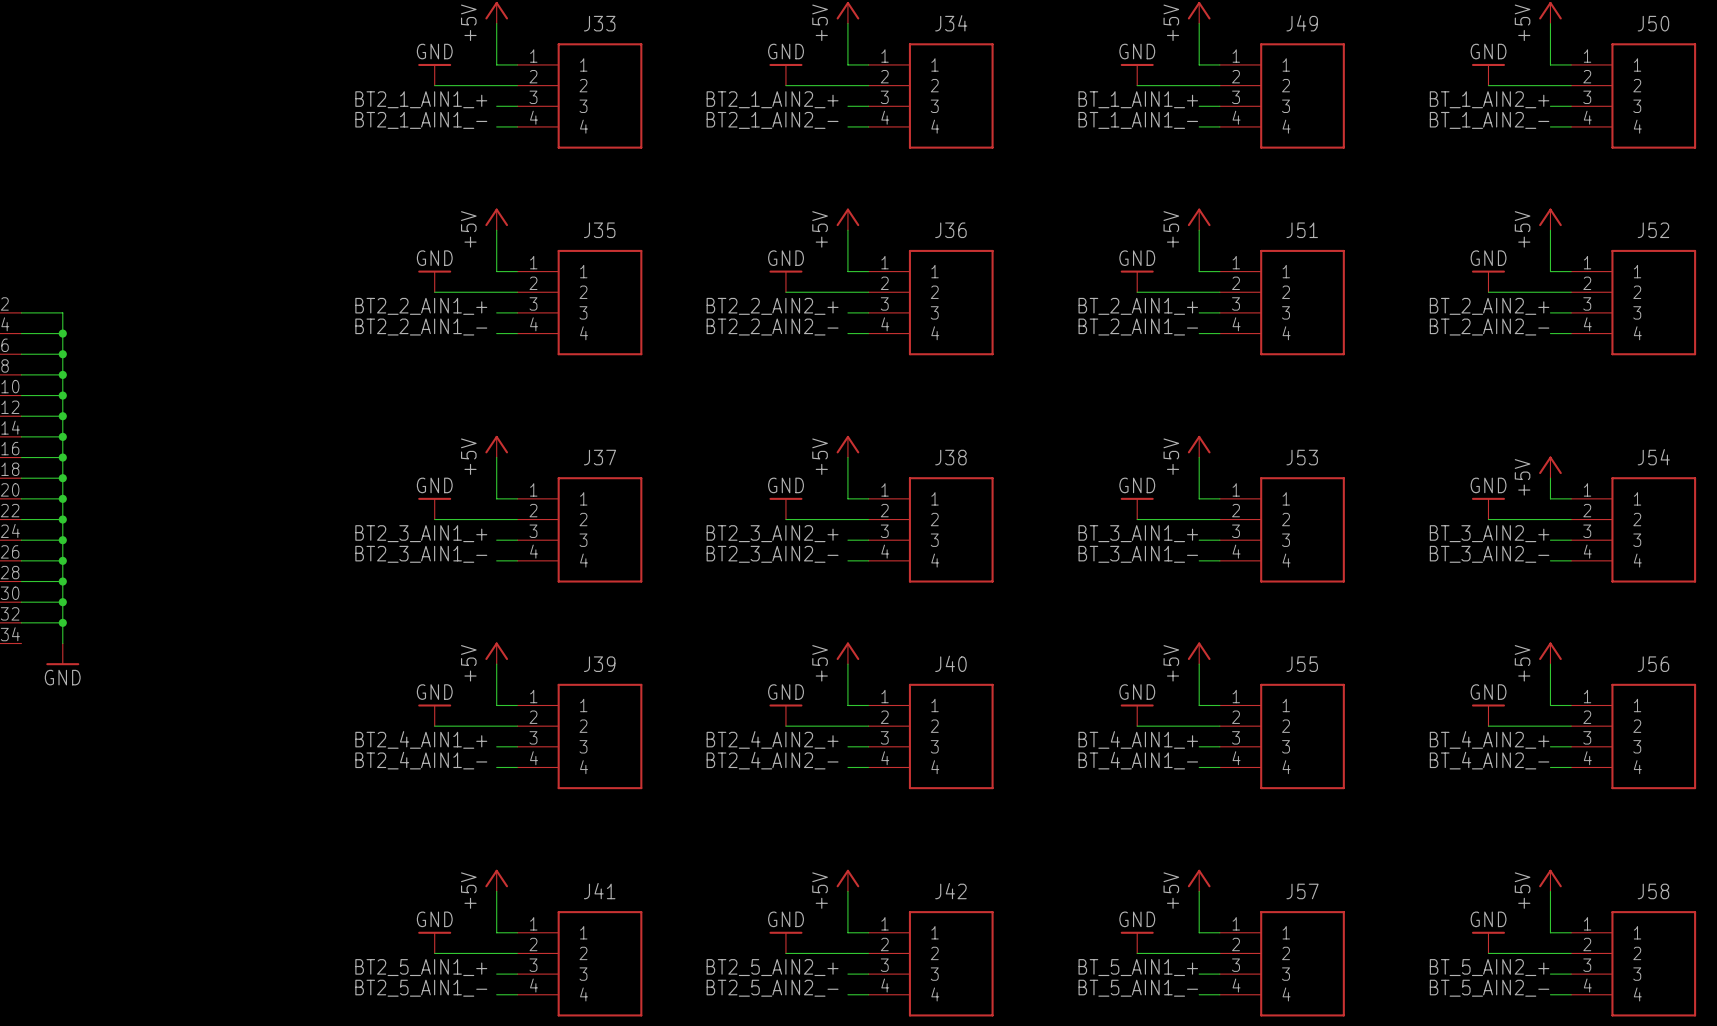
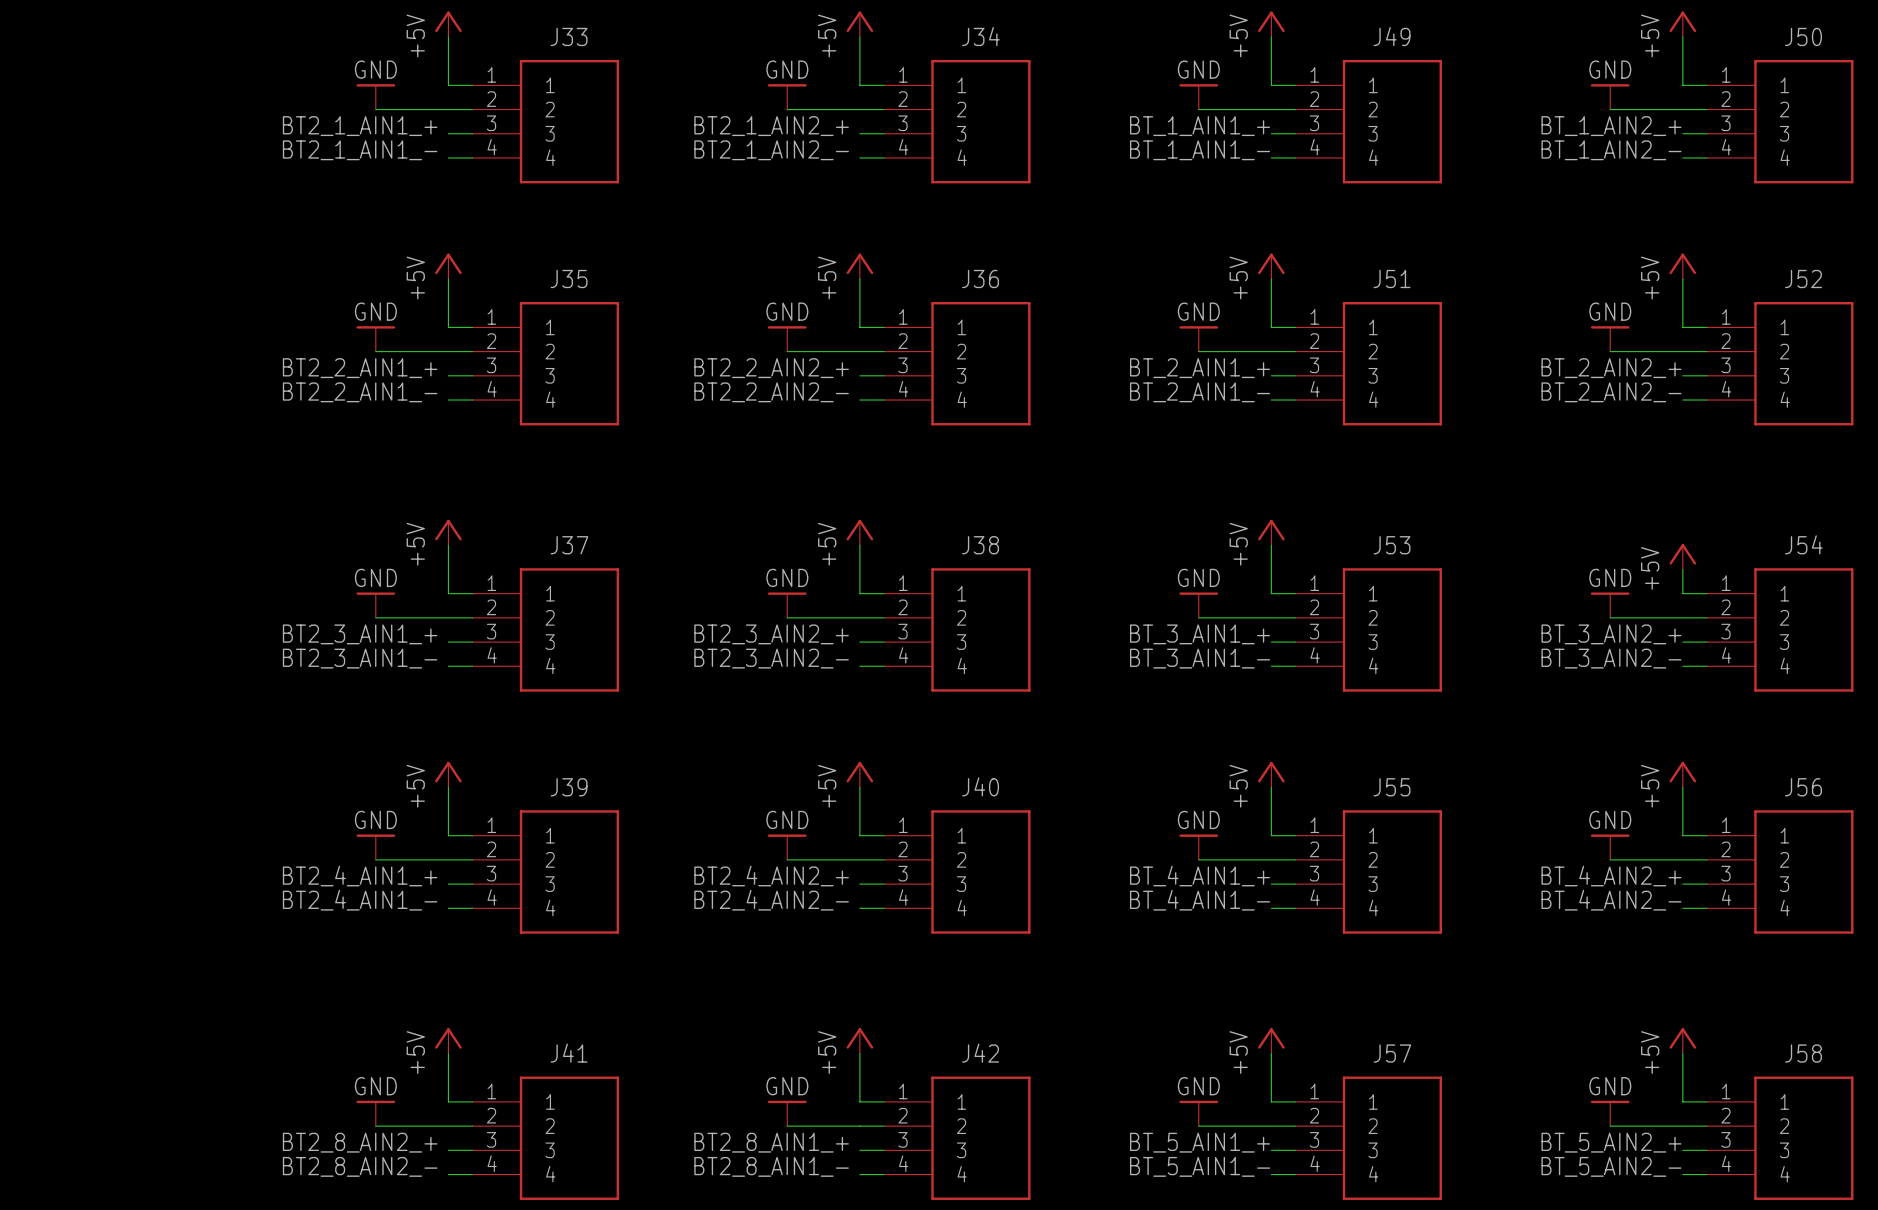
label: BT2_5_AIN1_+ (421, 967) -> BT2_8_AIN2_+ (360, 1142)
label: BT2_5_AIN2_+ (772, 967) -> BT2_8_AIN1_+ (771, 1142)
label: BT2_5_AIN1_- (421, 988) -> BT2_8_AIN2_- (360, 1166)
label: BT2_5_AIN2_- (772, 988) -> BT2_8_AIN1_- (771, 1166)

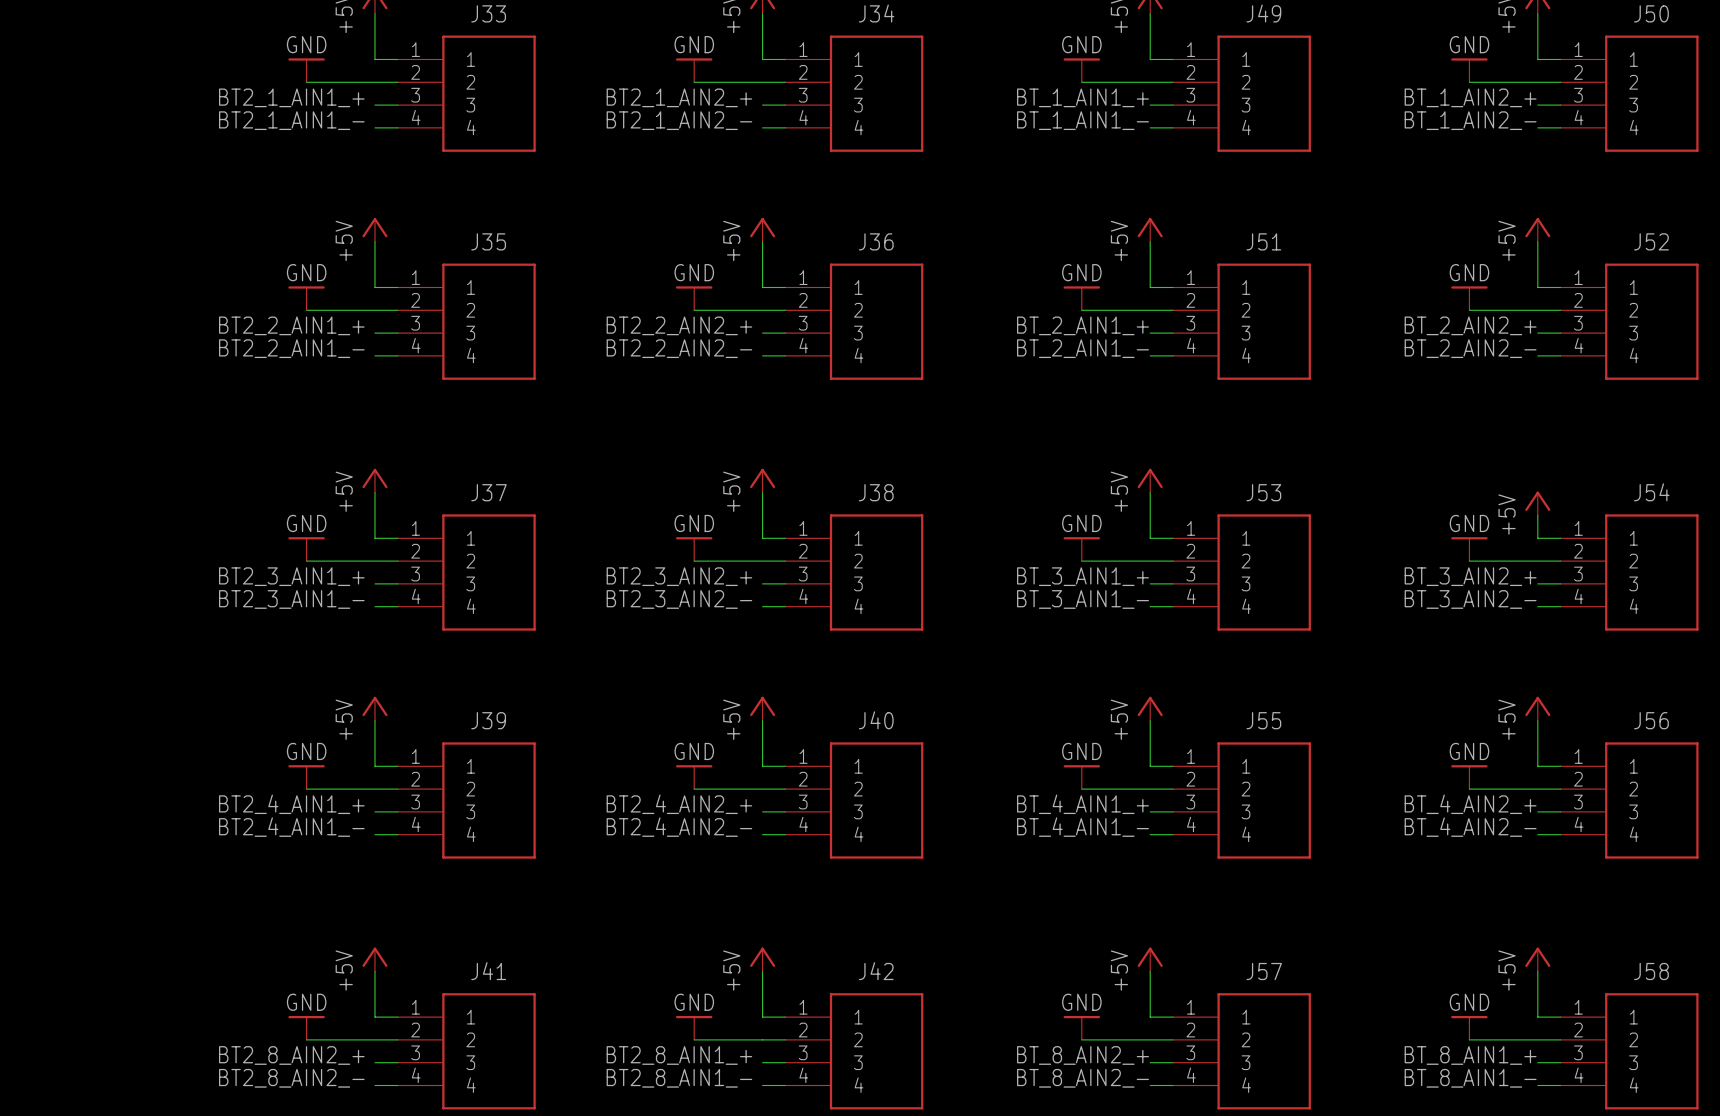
label: BT_5_AIN1_+ (1200, 1142) -> BT_8_AIN2_+ (1082, 1055)
label: BT_5_AIN2_+ (1611, 1142) -> BT_8_AIN1_+ (1470, 1055)
label: BT_5_AIN1_- (1200, 1166) -> BT_8_AIN2_- (1082, 1078)
label: BT_5_AIN2_- (1611, 1166) -> BT_8_AIN1_- (1470, 1078)

